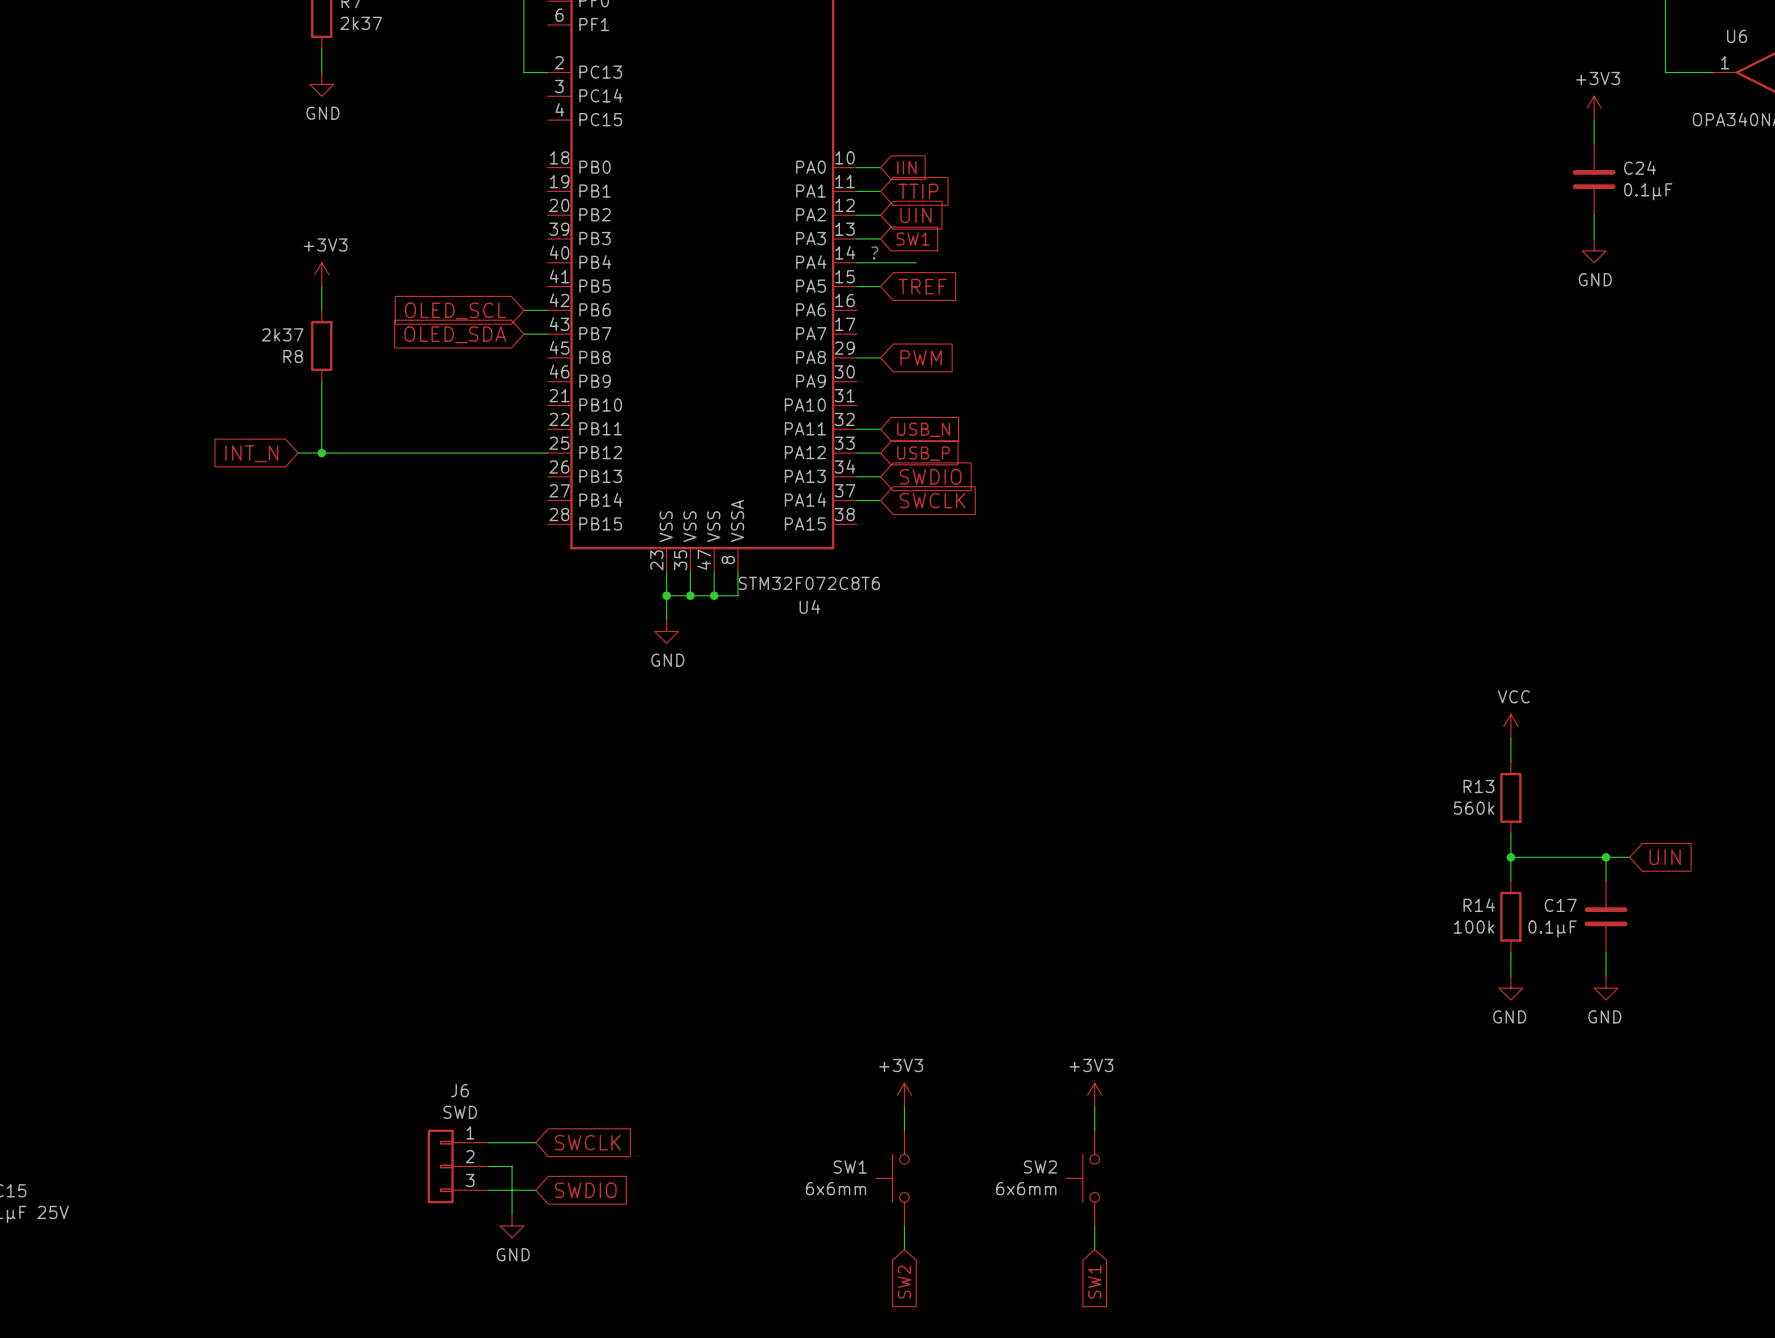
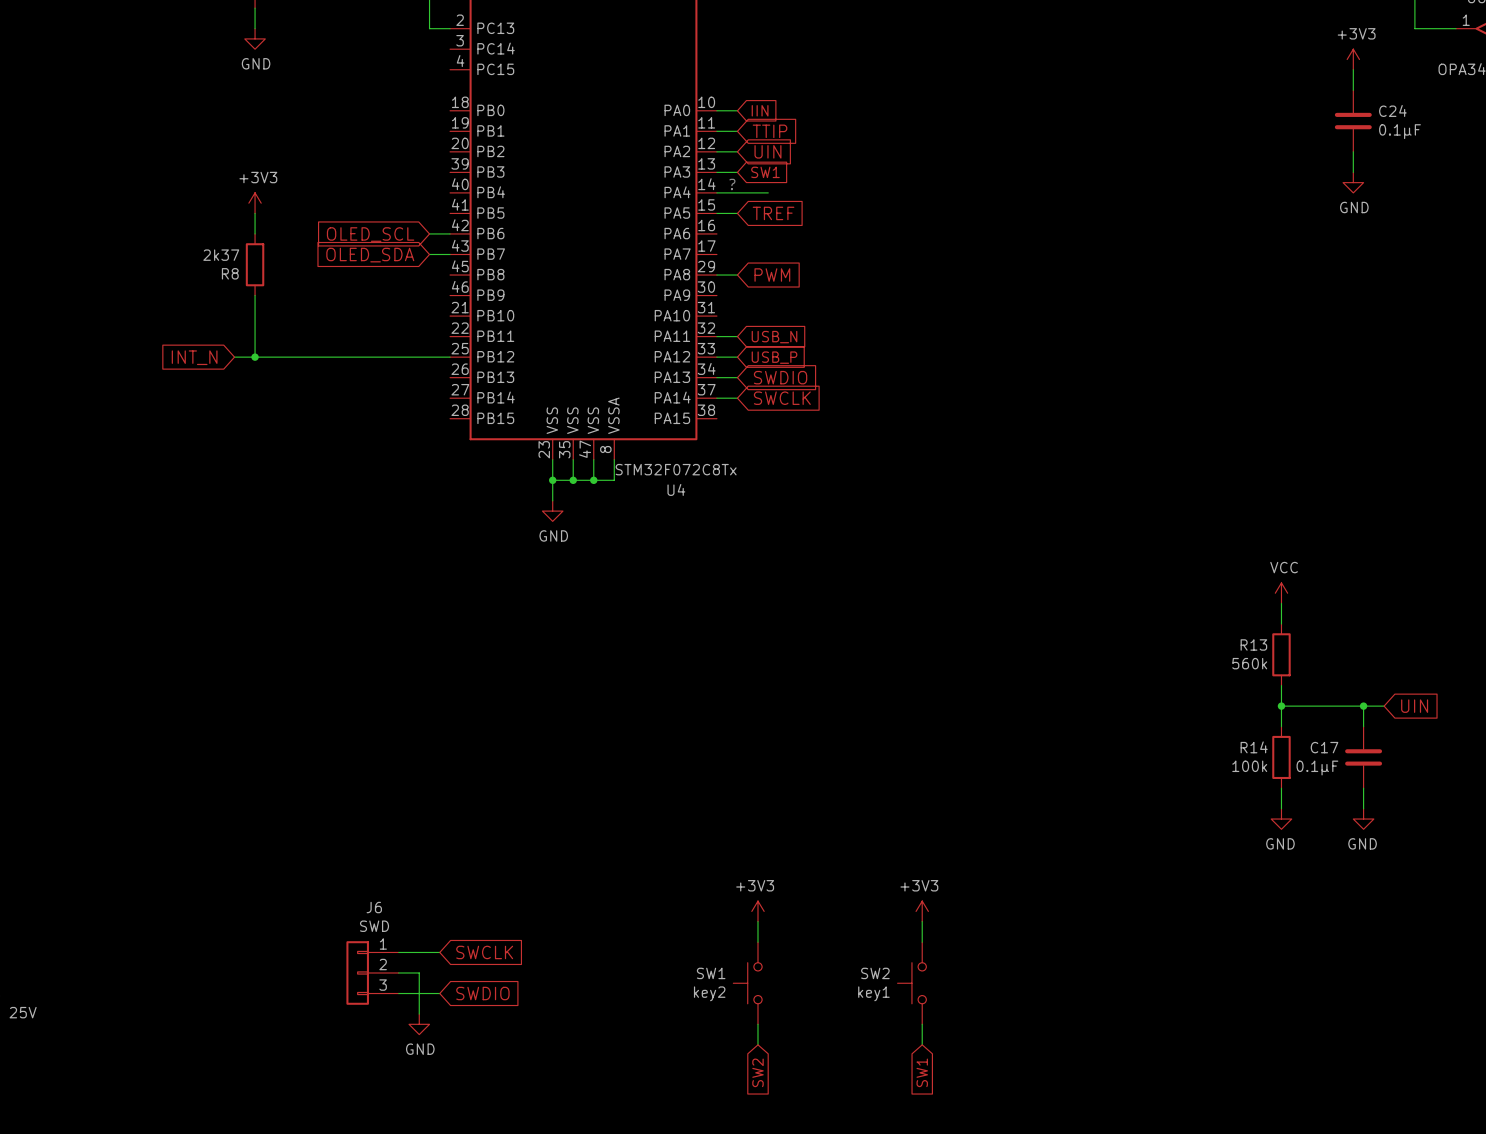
U4 value: STM32F072C8T6 (809, 583) -> STM32F072C8Tx (676, 469)
SW1 value: 6x6mm (836, 1188) -> key2 (709, 993)
SW2 value: 6x6mm (1026, 1188) -> key1 (873, 993)

